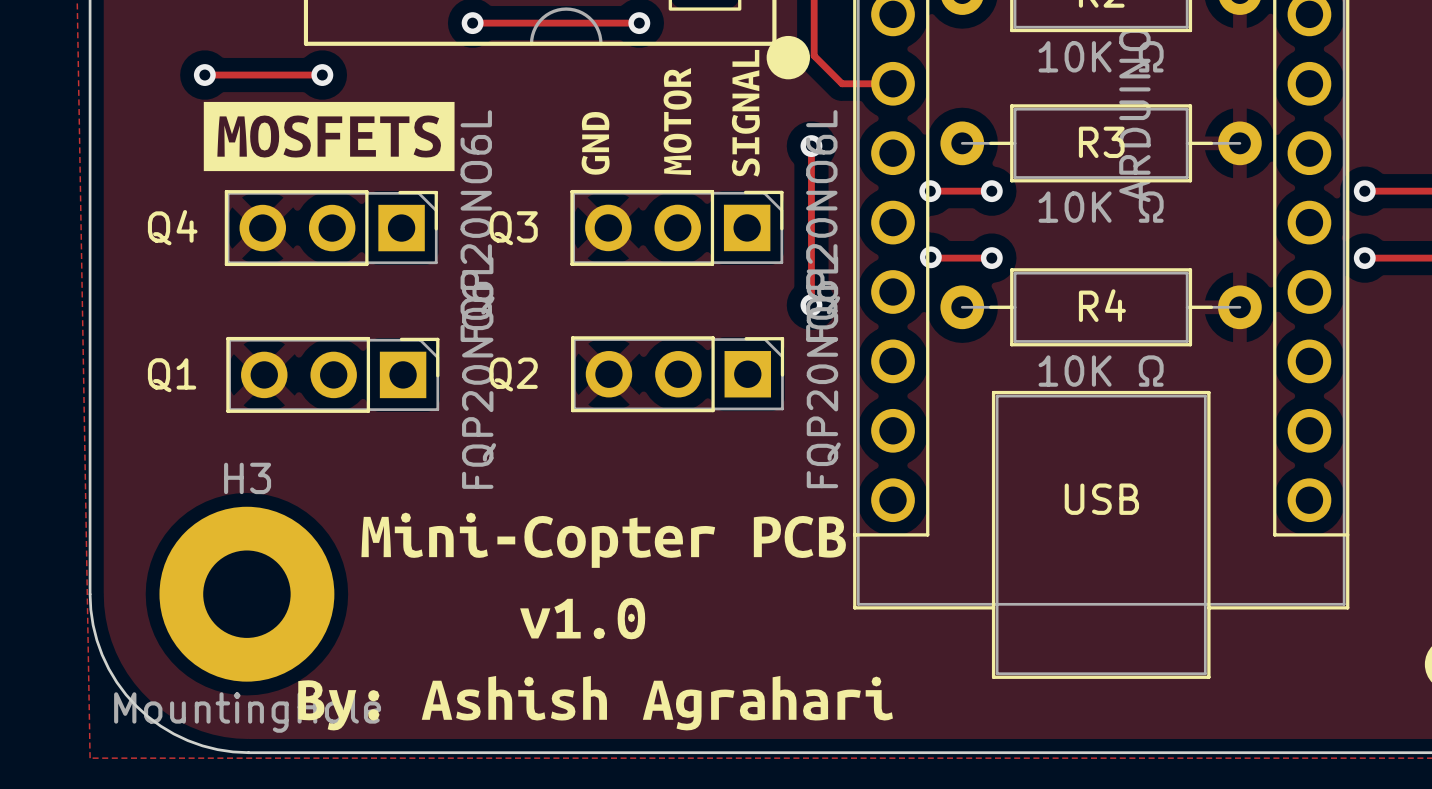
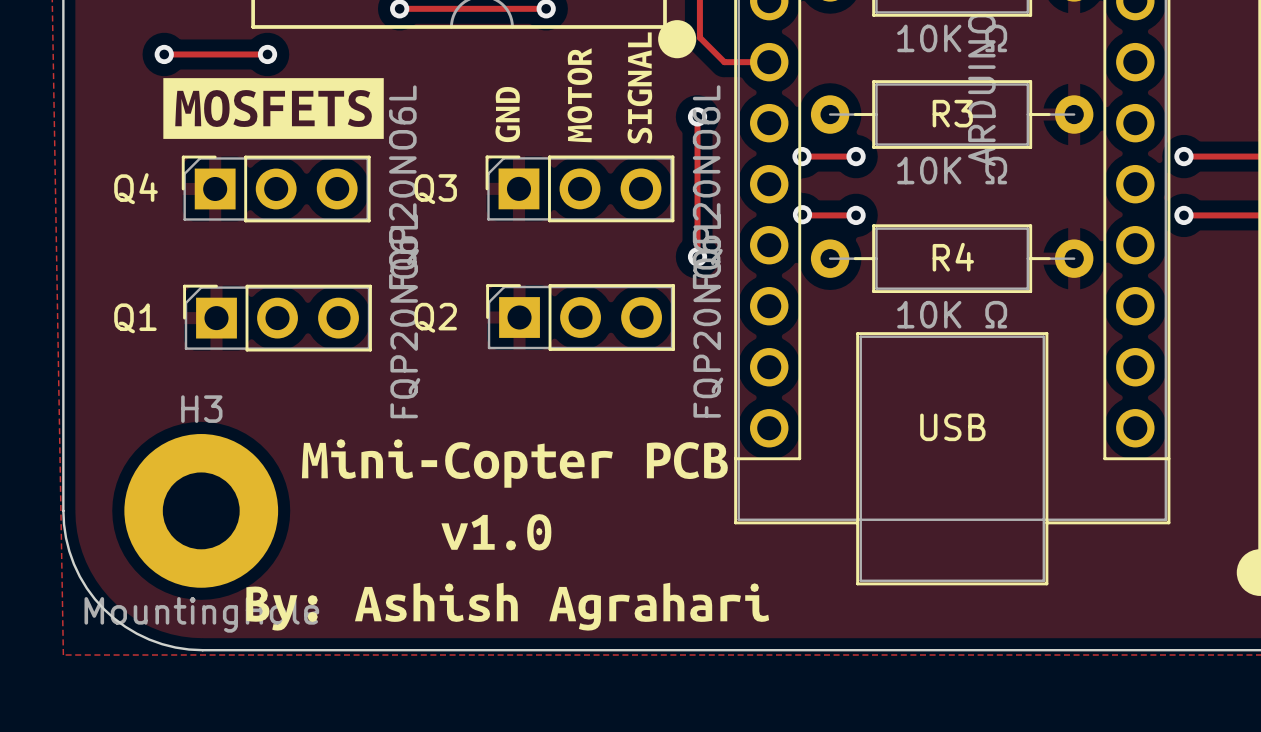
Q3 footprint: [570, 189, 784, 266] -> [485, 155, 675, 223]
Q4 footprint: [224, 190, 438, 267] -> [181, 155, 371, 223]
Q1 footprint: [226, 336, 440, 413] -> [183, 284, 372, 352]
Q2 footprint: [570, 336, 785, 413] -> [486, 284, 675, 351]

